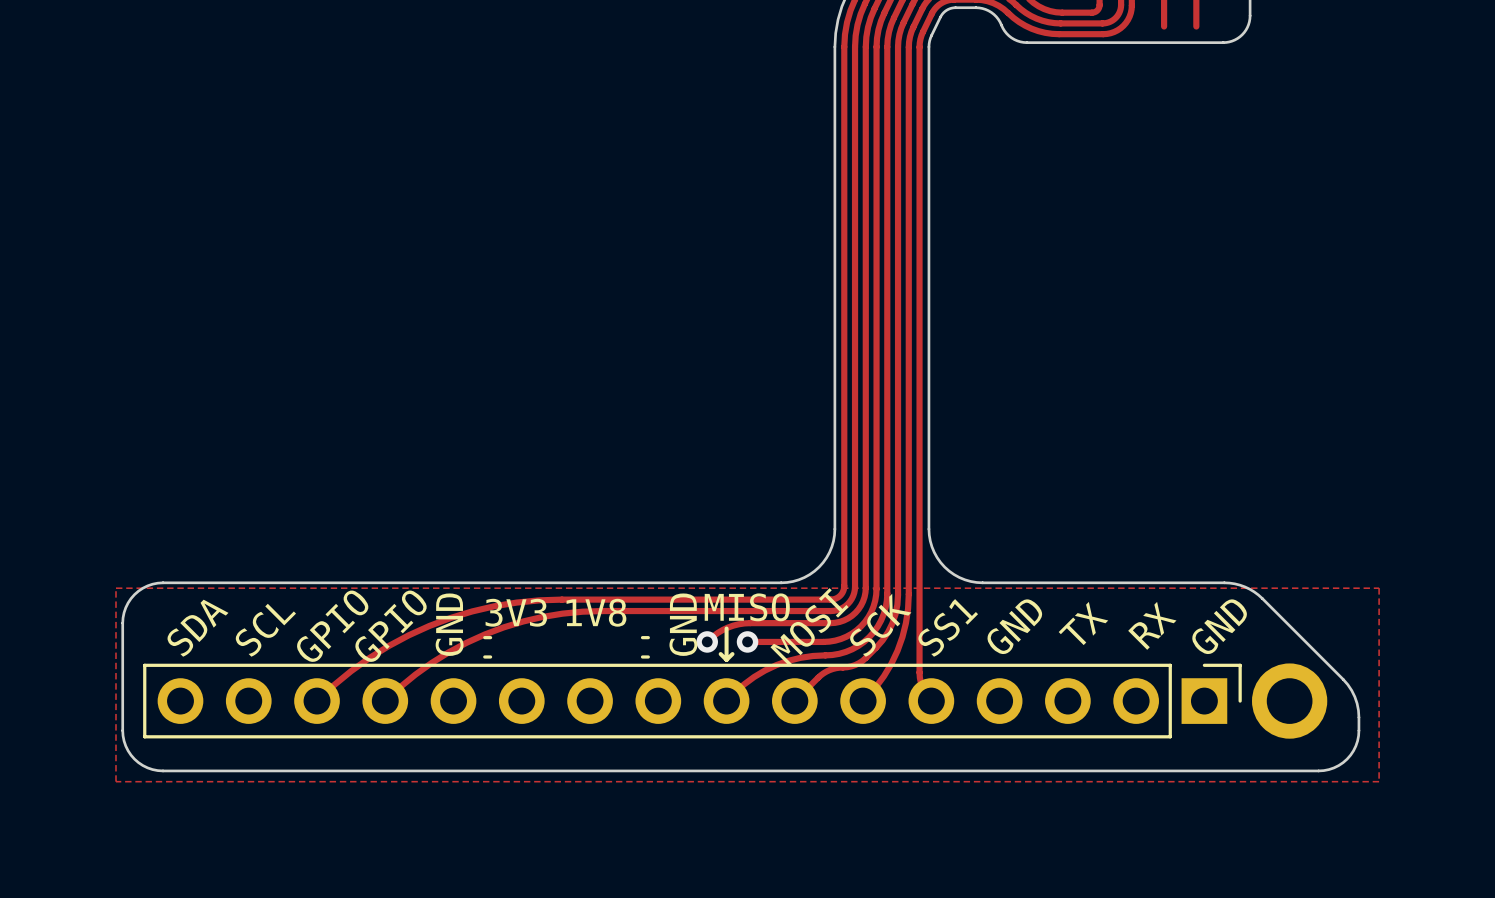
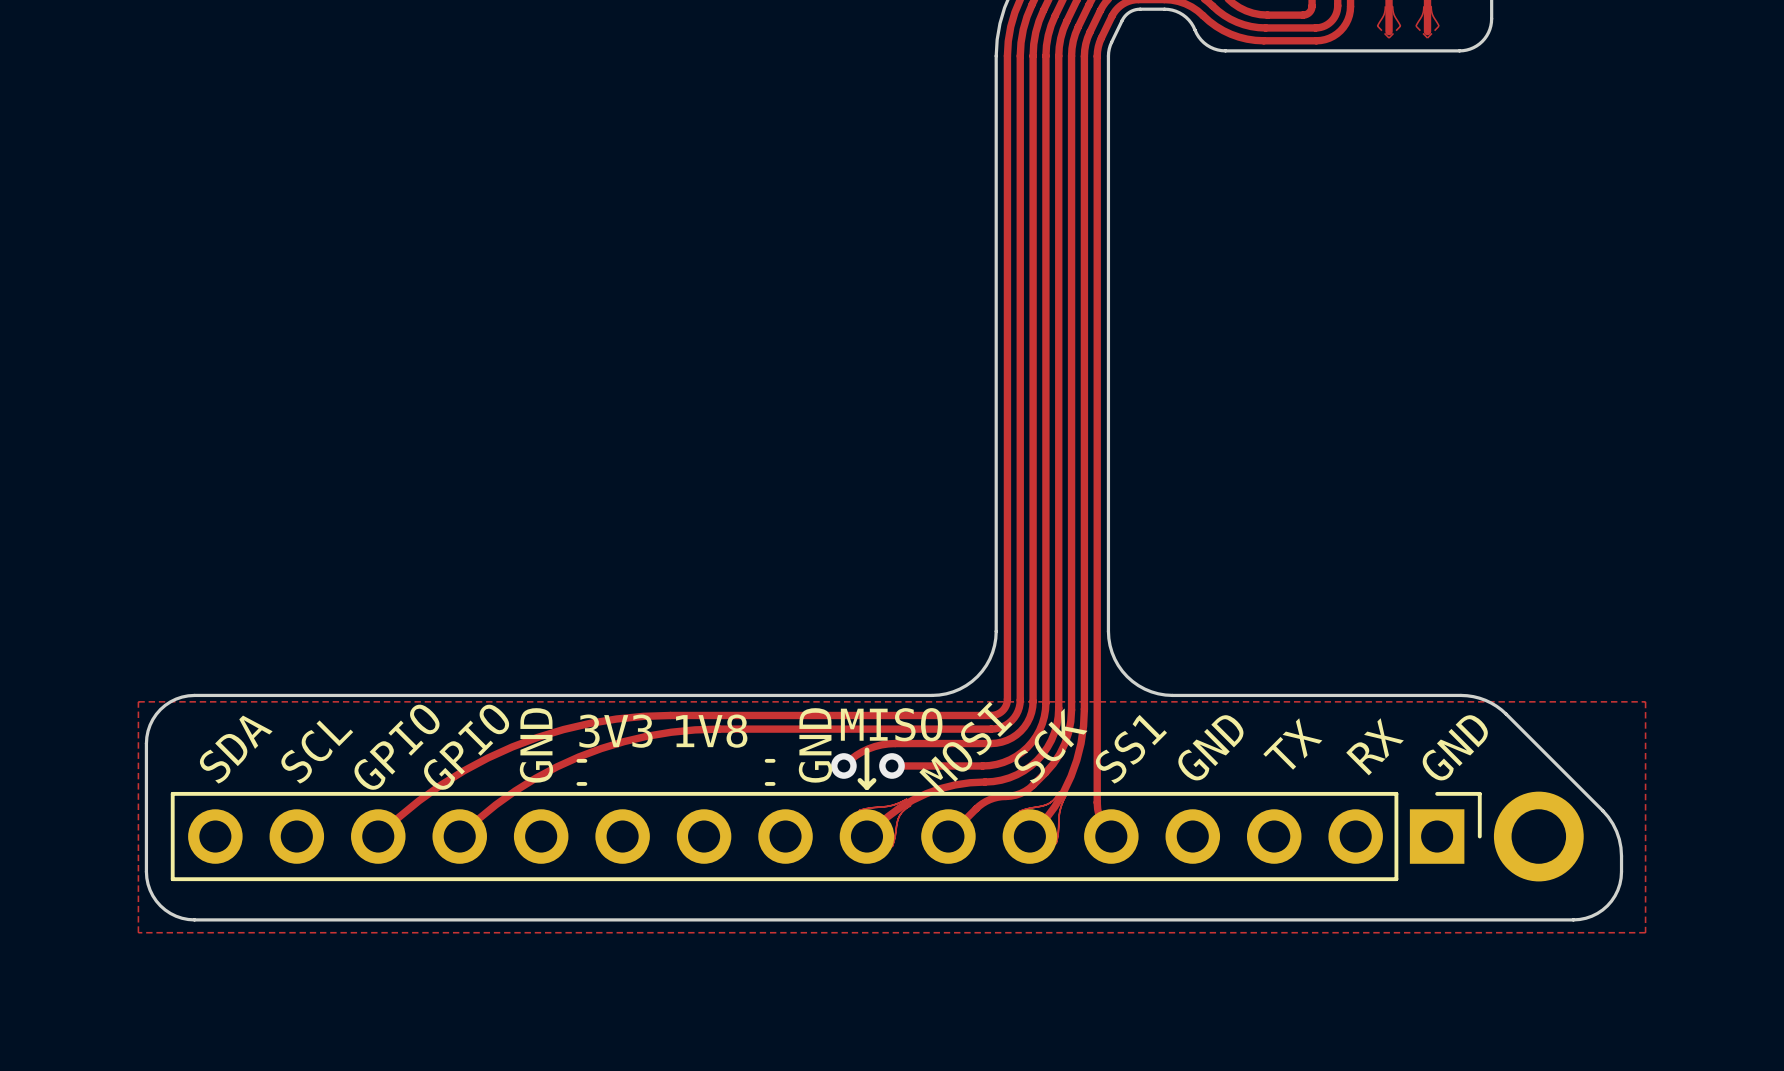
zone outline: none -> (1385, 6) (1383, 15) (1377, 26) (1389, 38) (1400, 26) (1394, 15) (1392, 6) (1385, 6)
zone outline: none -> (1423, 6) (1431, 6) (1432, 15) (1439, 26) (1427, 38) (1415, 26) (1422, 15) (1423, 6)
zone outline: none -> (1059, 791) (1049, 803) (1019, 811) (1020, 846) (1056, 843) (1059, 811) (1066, 795) (1059, 791)
zone outline: none -> (907, 798) (891, 805) (859, 810) (856, 845) (892, 846) (899, 815) (910, 805) (907, 798)

